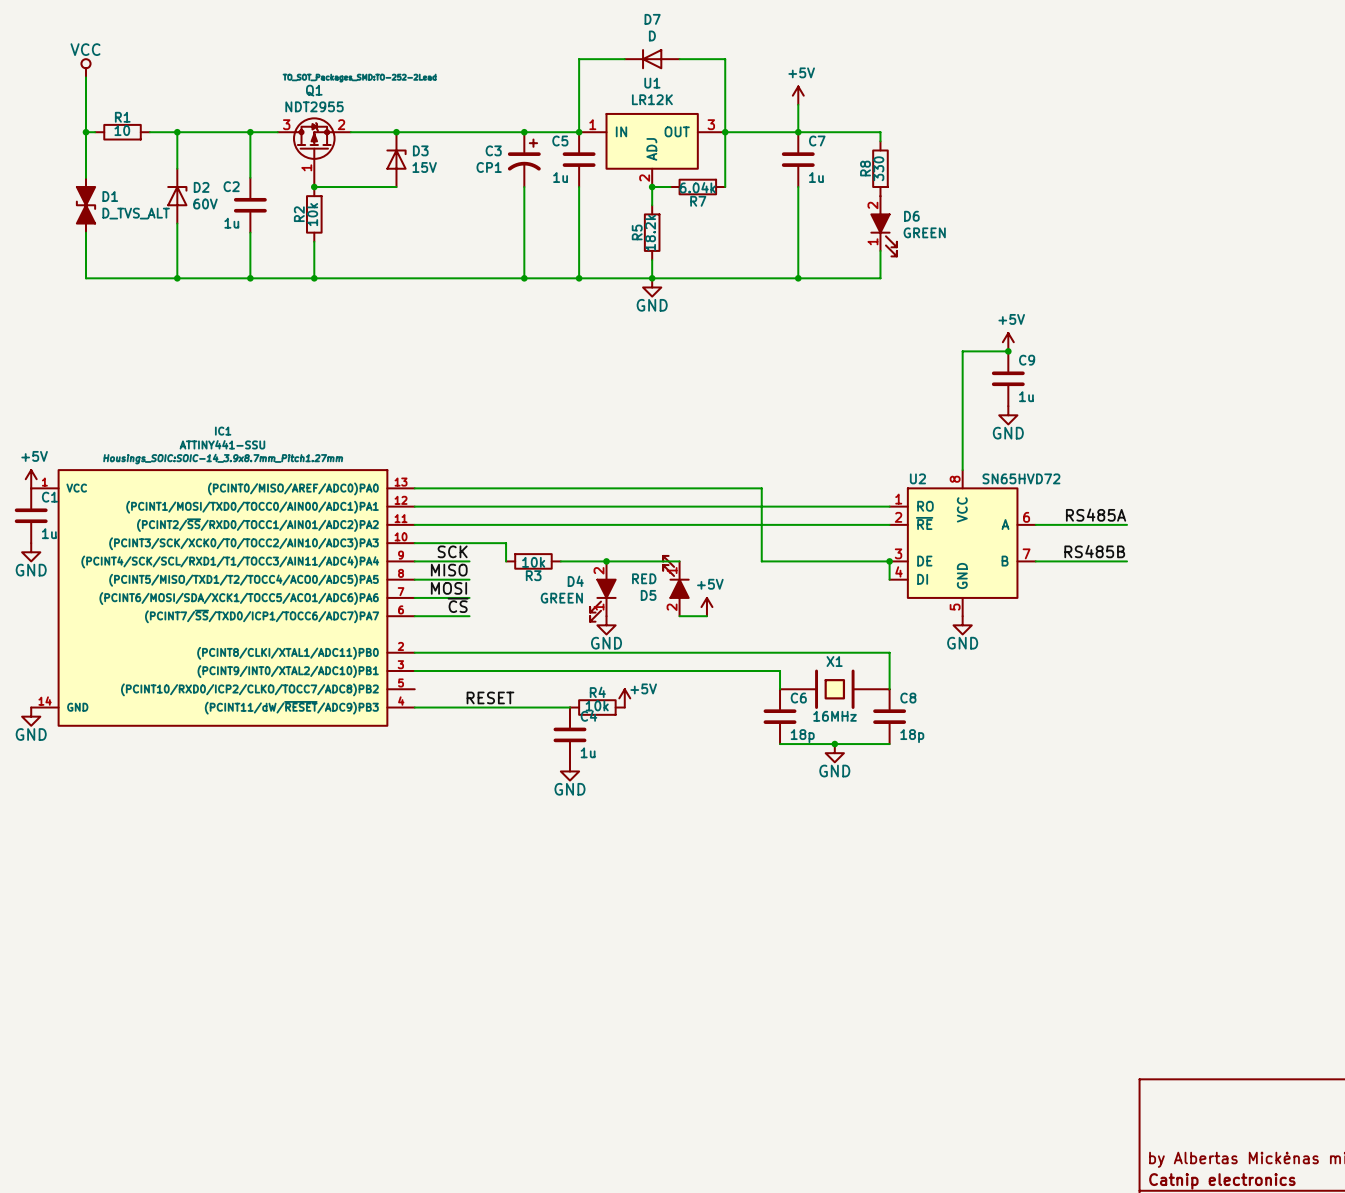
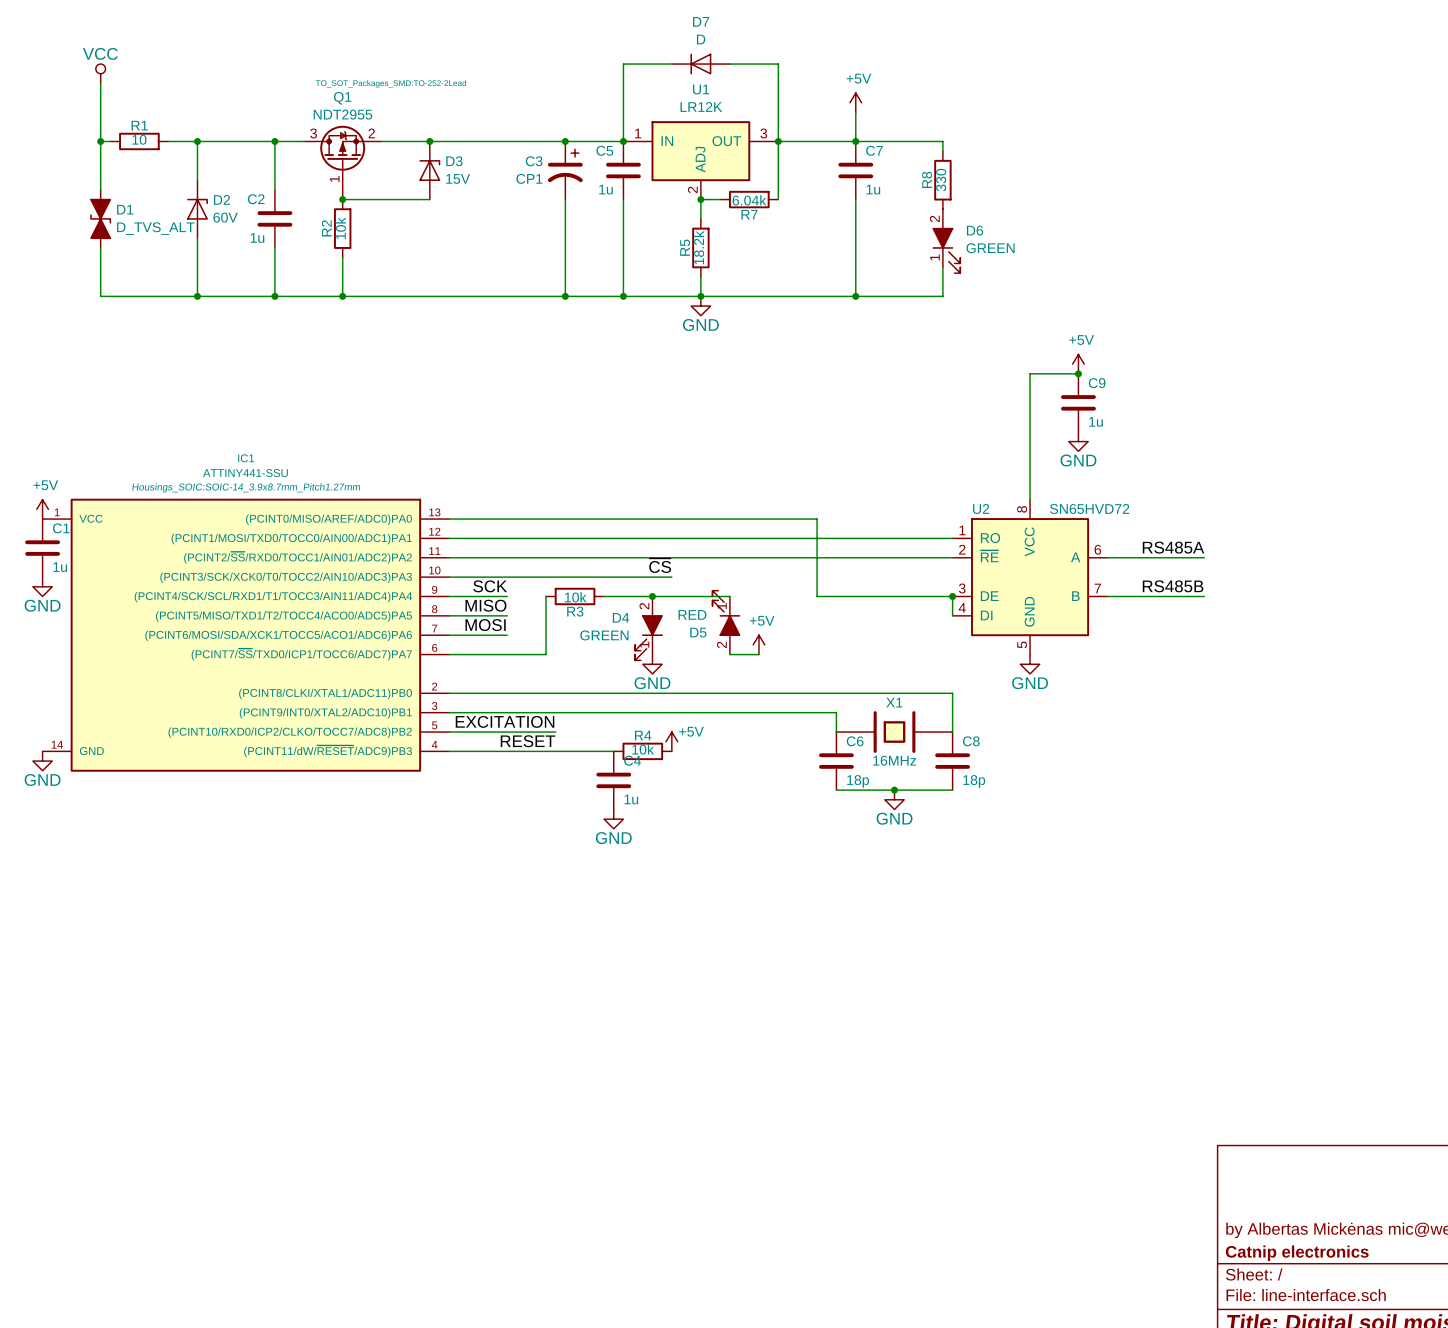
wire: (506, 543) (506, 561) -> (507, 654) (545, 654) (545, 596)
wire: none -> (545, 577) (671, 577)
label position: ~{CS} (458, 605) -> ~{CS} (660, 565)
label: none -> EXCITATION (505, 721)
wire: none -> (449, 732) (555, 732)

